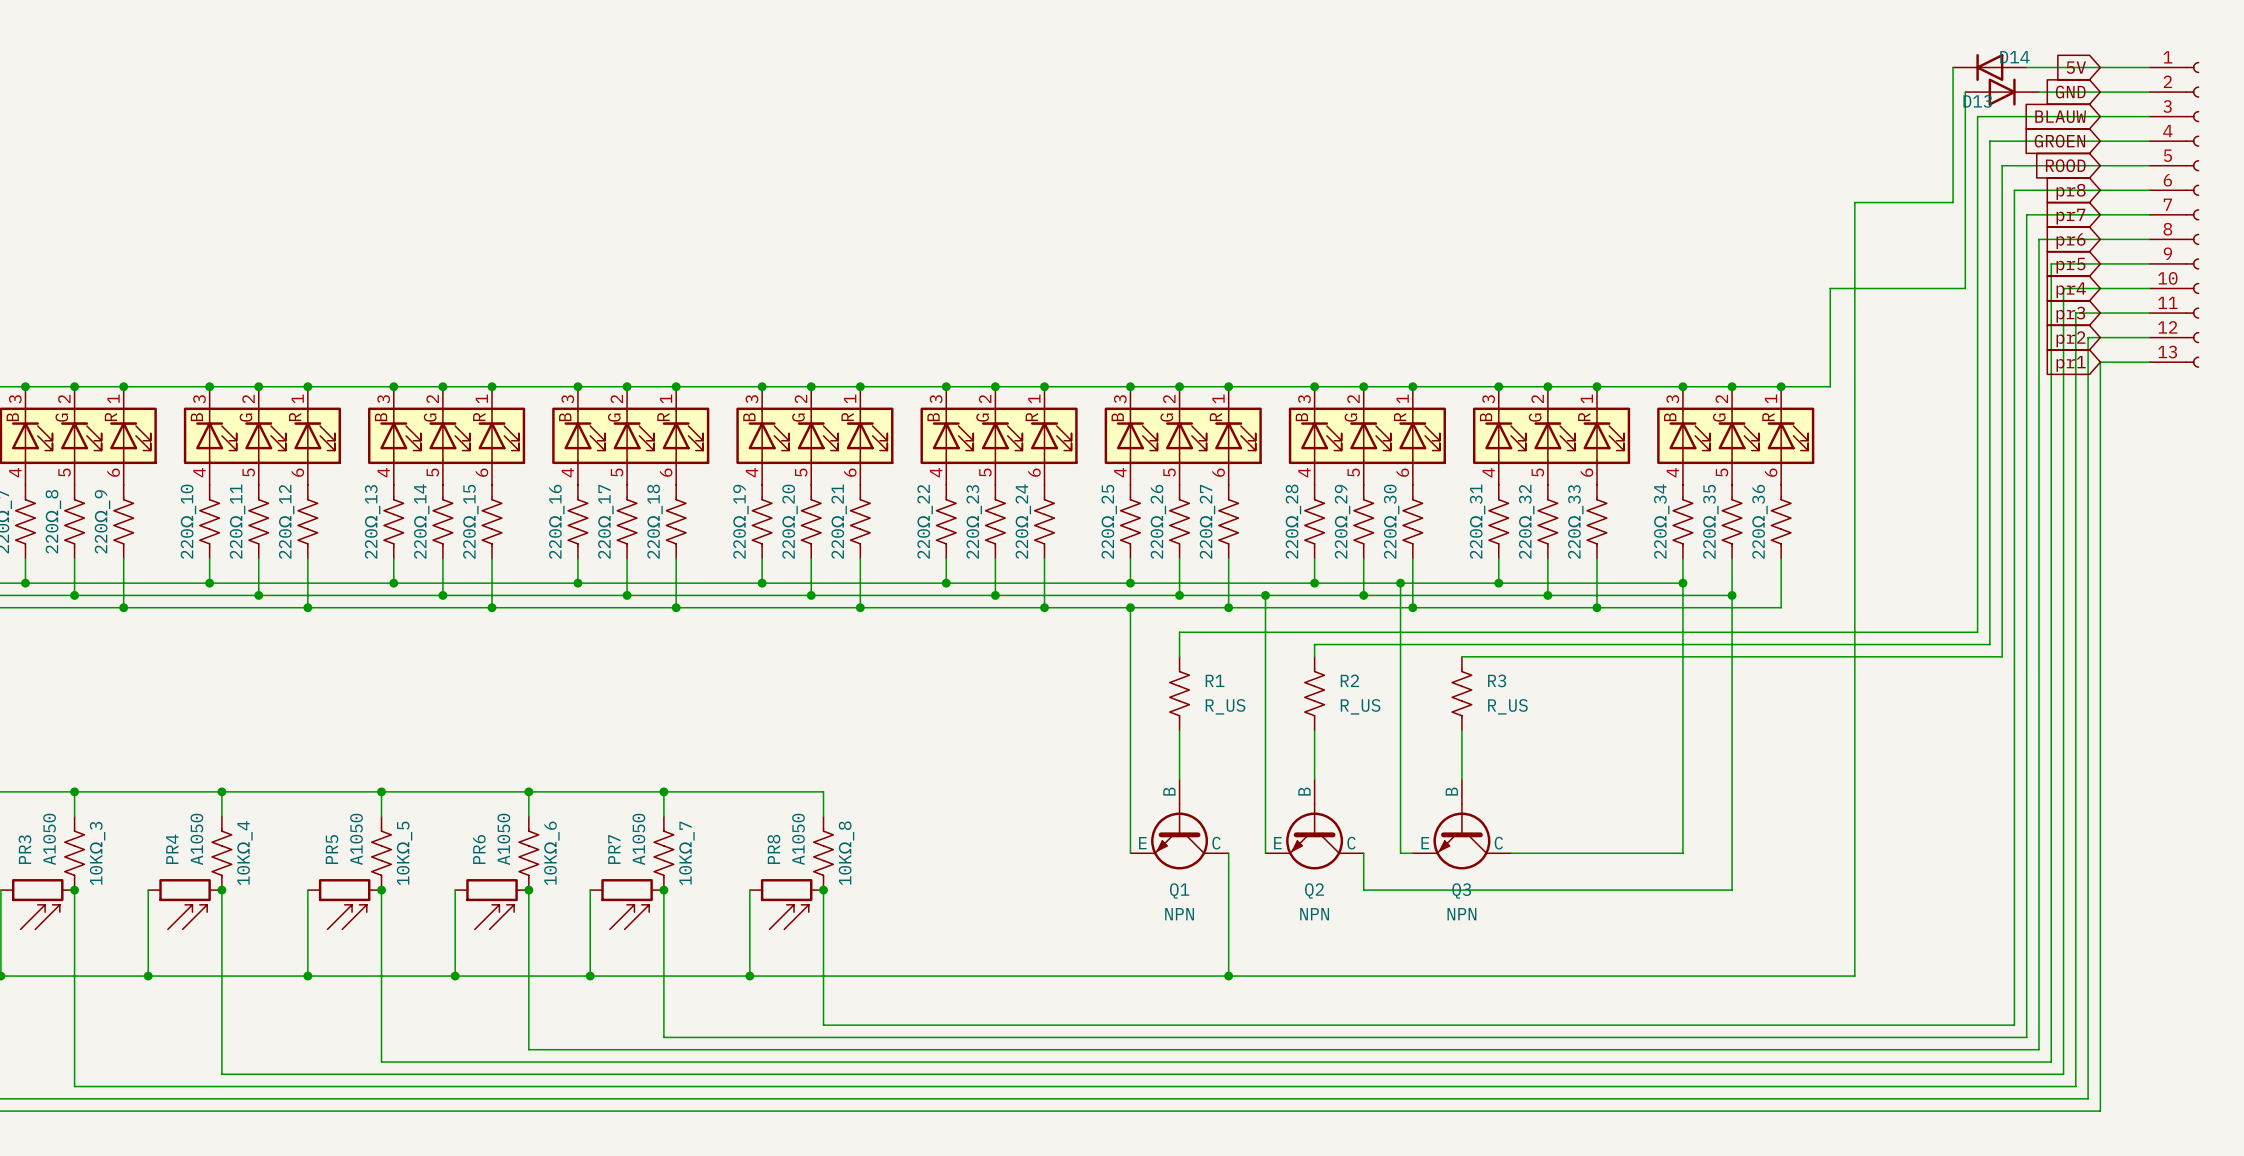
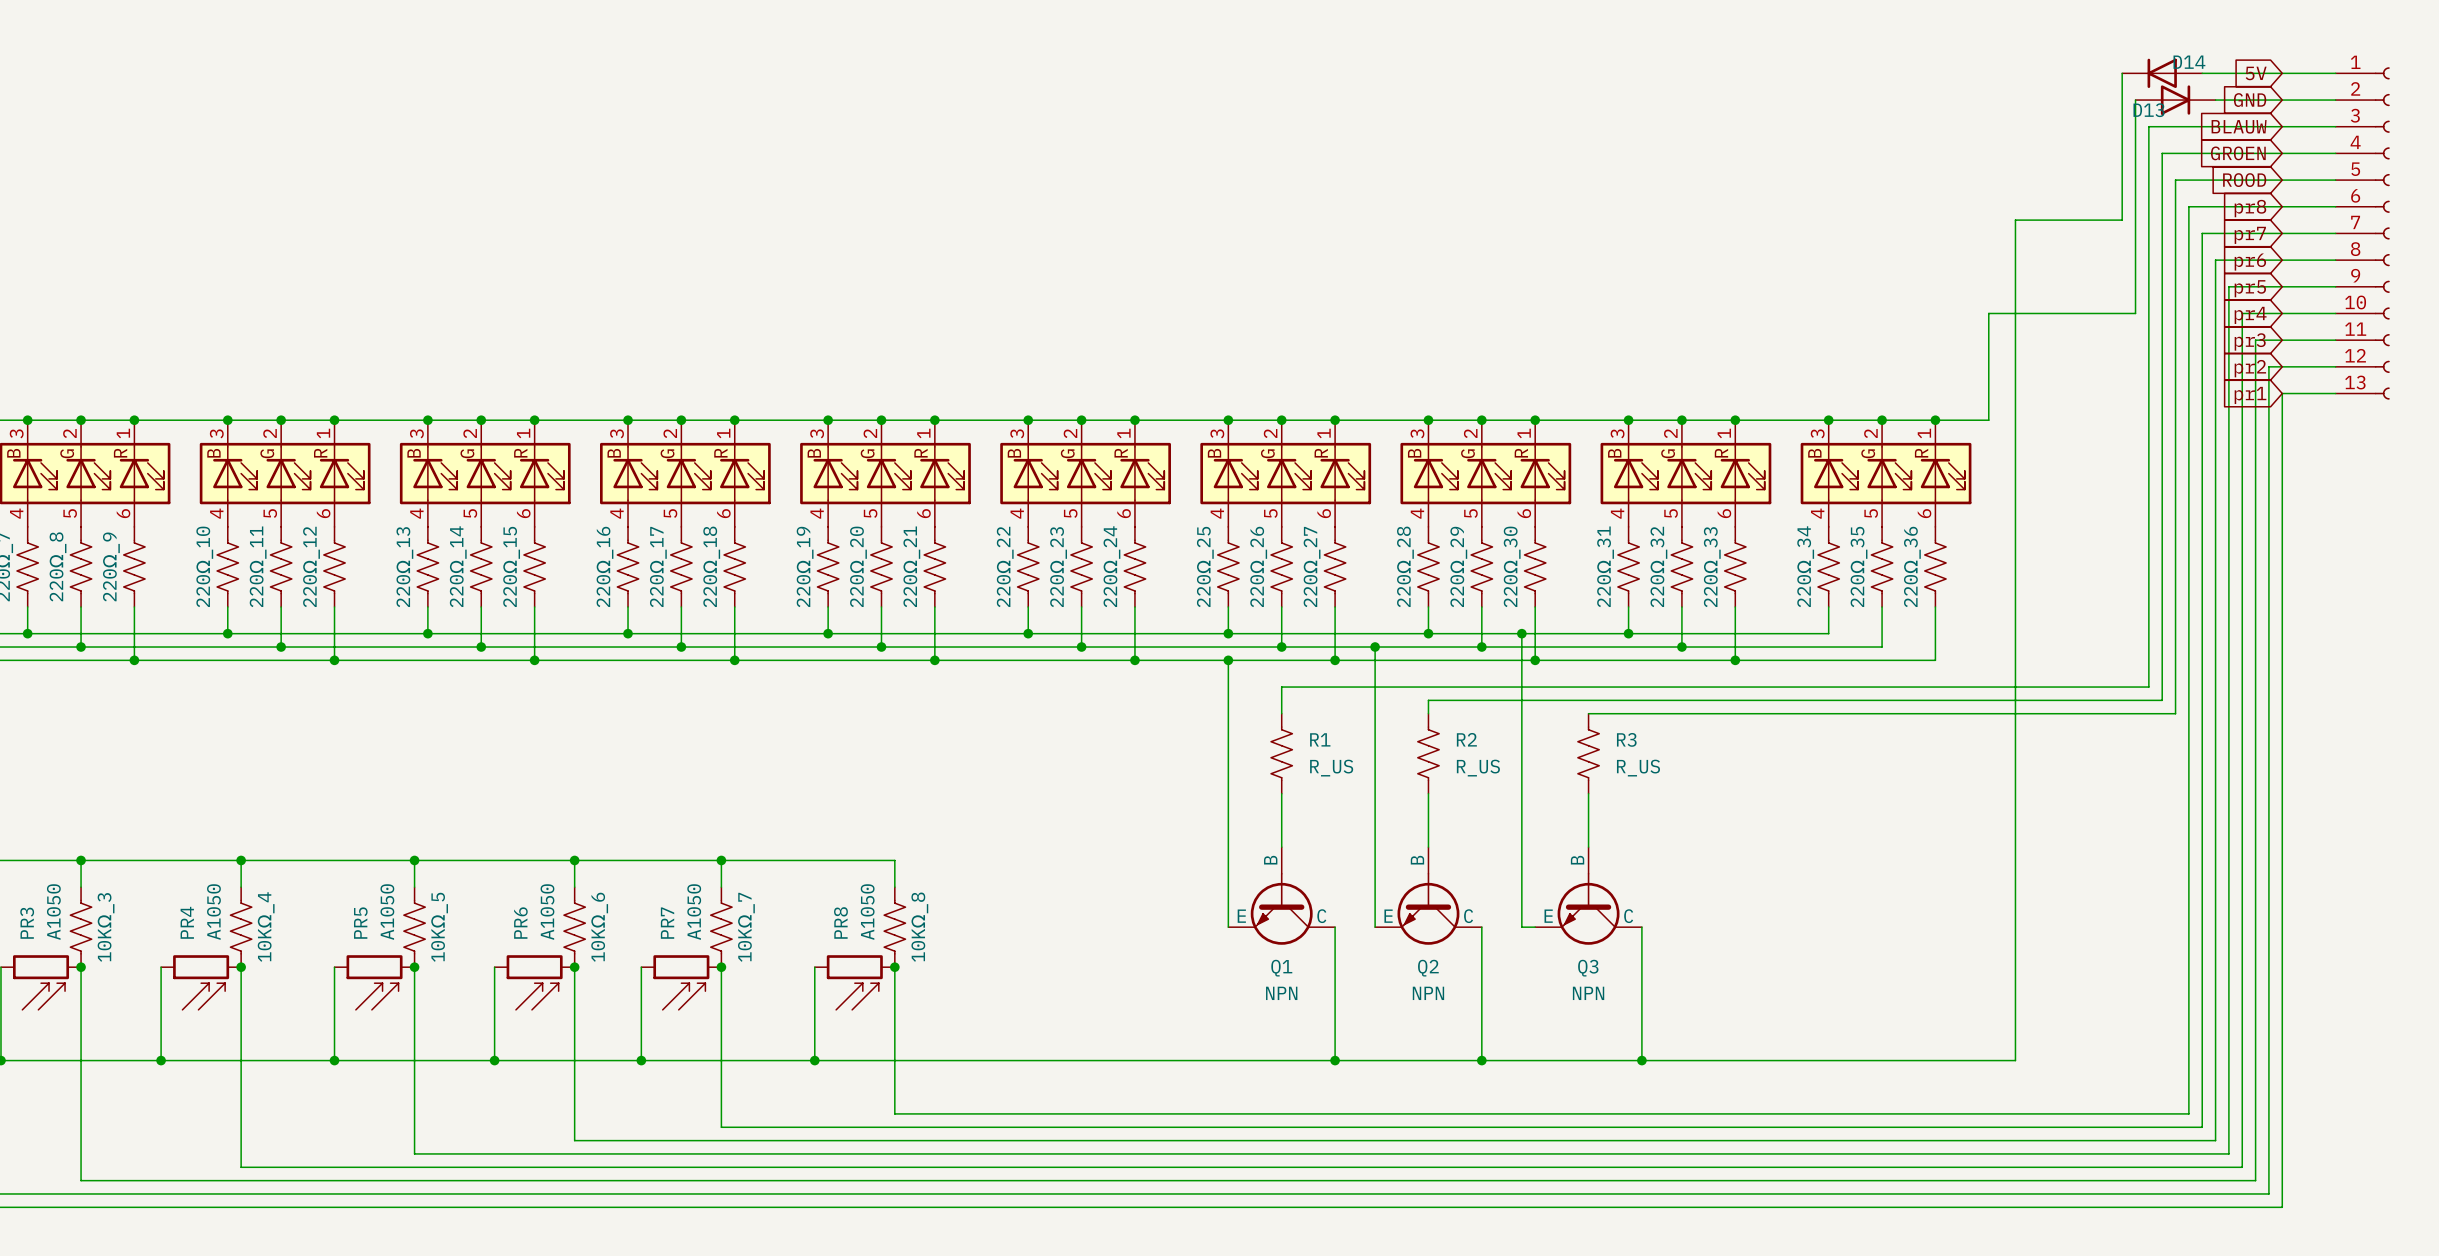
wire: (1682, 583) (1682, 853) (1511, 853) -> (1641, 1060) (1641, 927)
junction: (1682, 583) -> none
wire: (1732, 595) (1732, 890) (1363, 890) -> (1481, 1060) (1481, 967)
junction: (1732, 595) -> none
junction: none -> (1481, 1060)
junction: none -> (1641, 1060)

